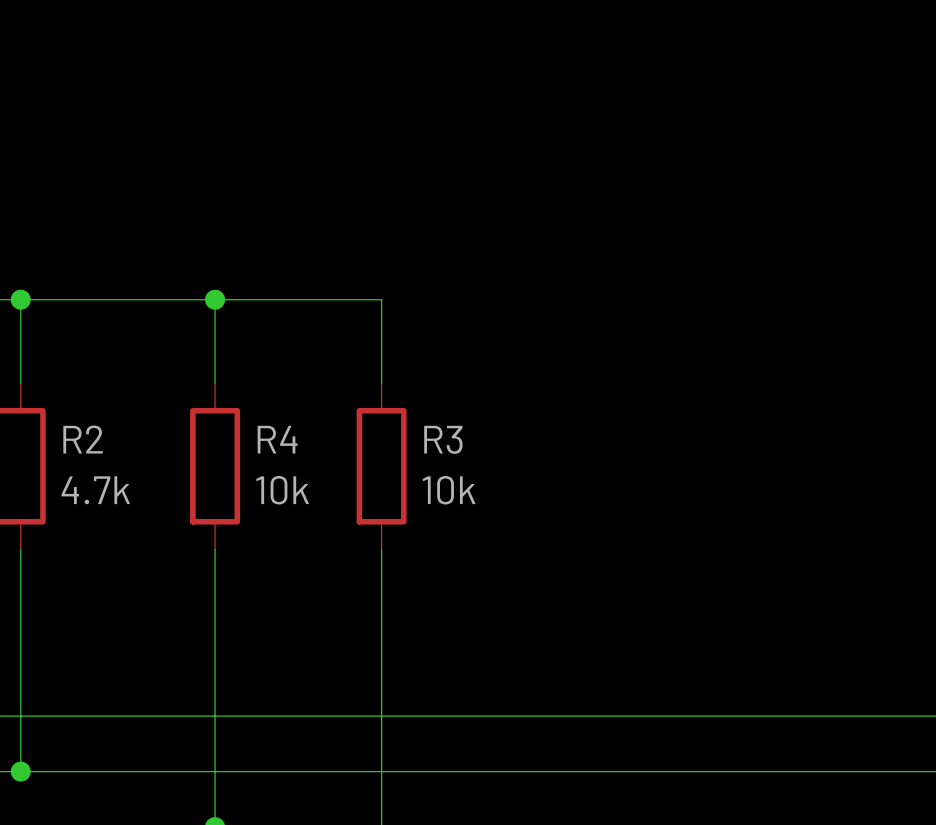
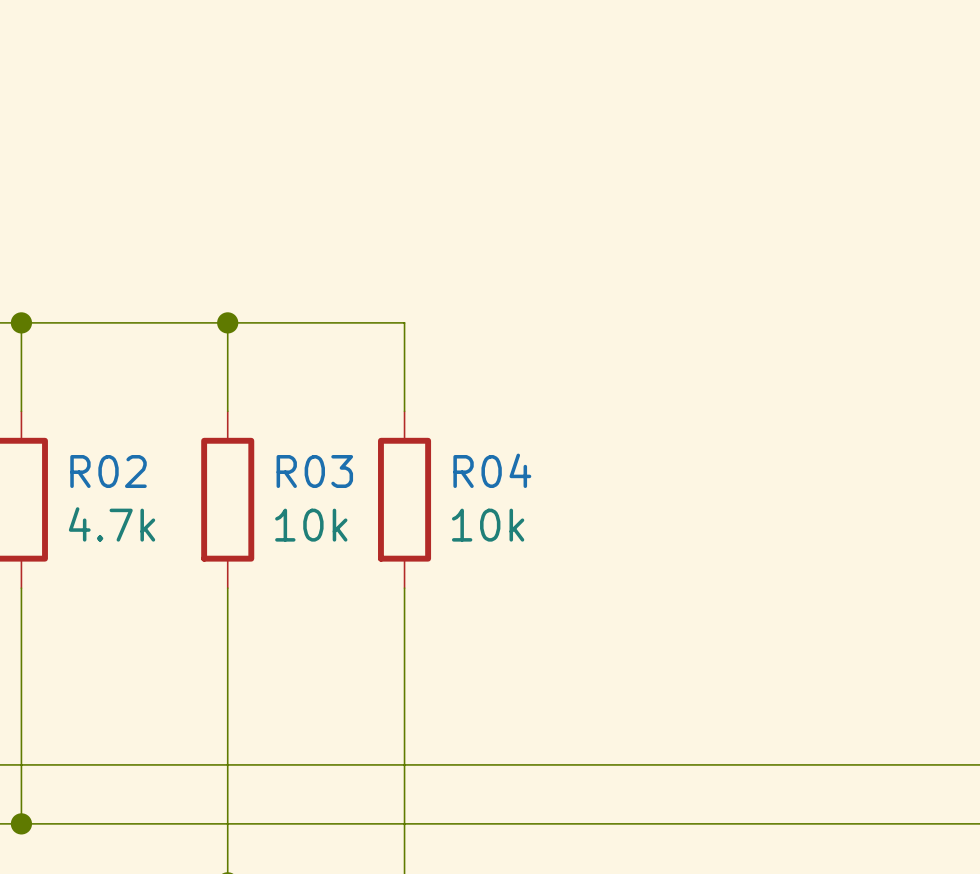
R2 name: R2 (83, 439) -> R02 (108, 471)
R4 name: R4 (277, 439) -> R03 (314, 471)
R3 name: R3 (443, 439) -> R04 (492, 470)

